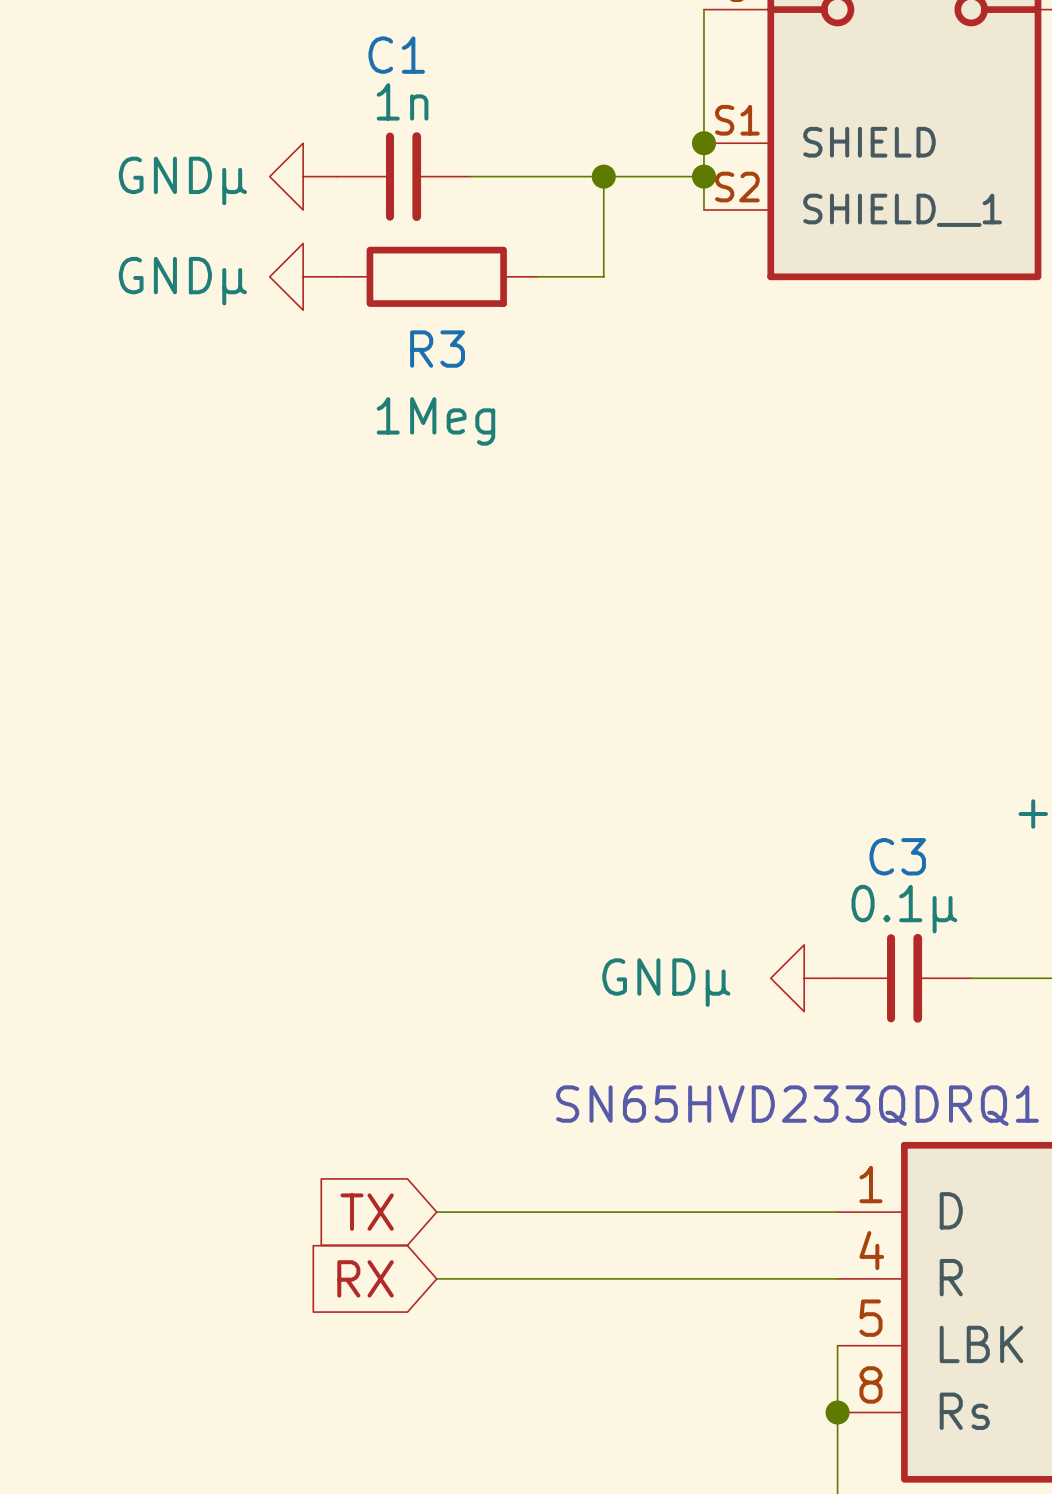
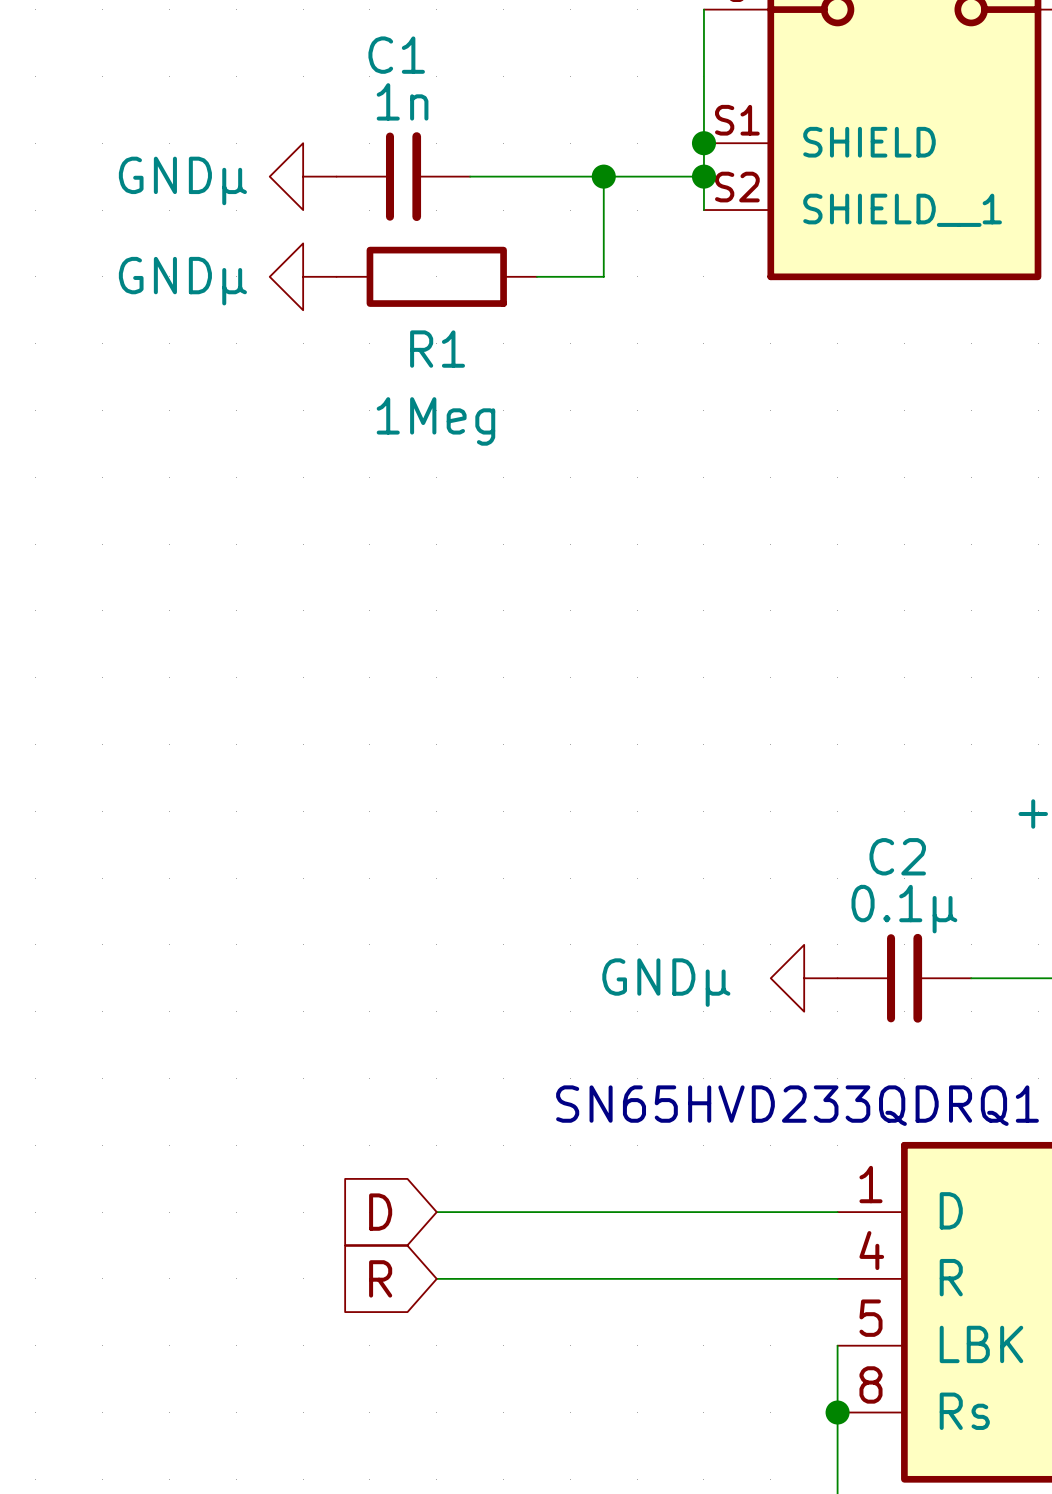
R3 name: R3 (437, 349) -> R1 (437, 349)
C3 name: C3 (897, 856) -> C2 (897, 856)
global label: TX (367, 1212) -> D (380, 1212)
global label: RX (365, 1278) -> R (380, 1278)

